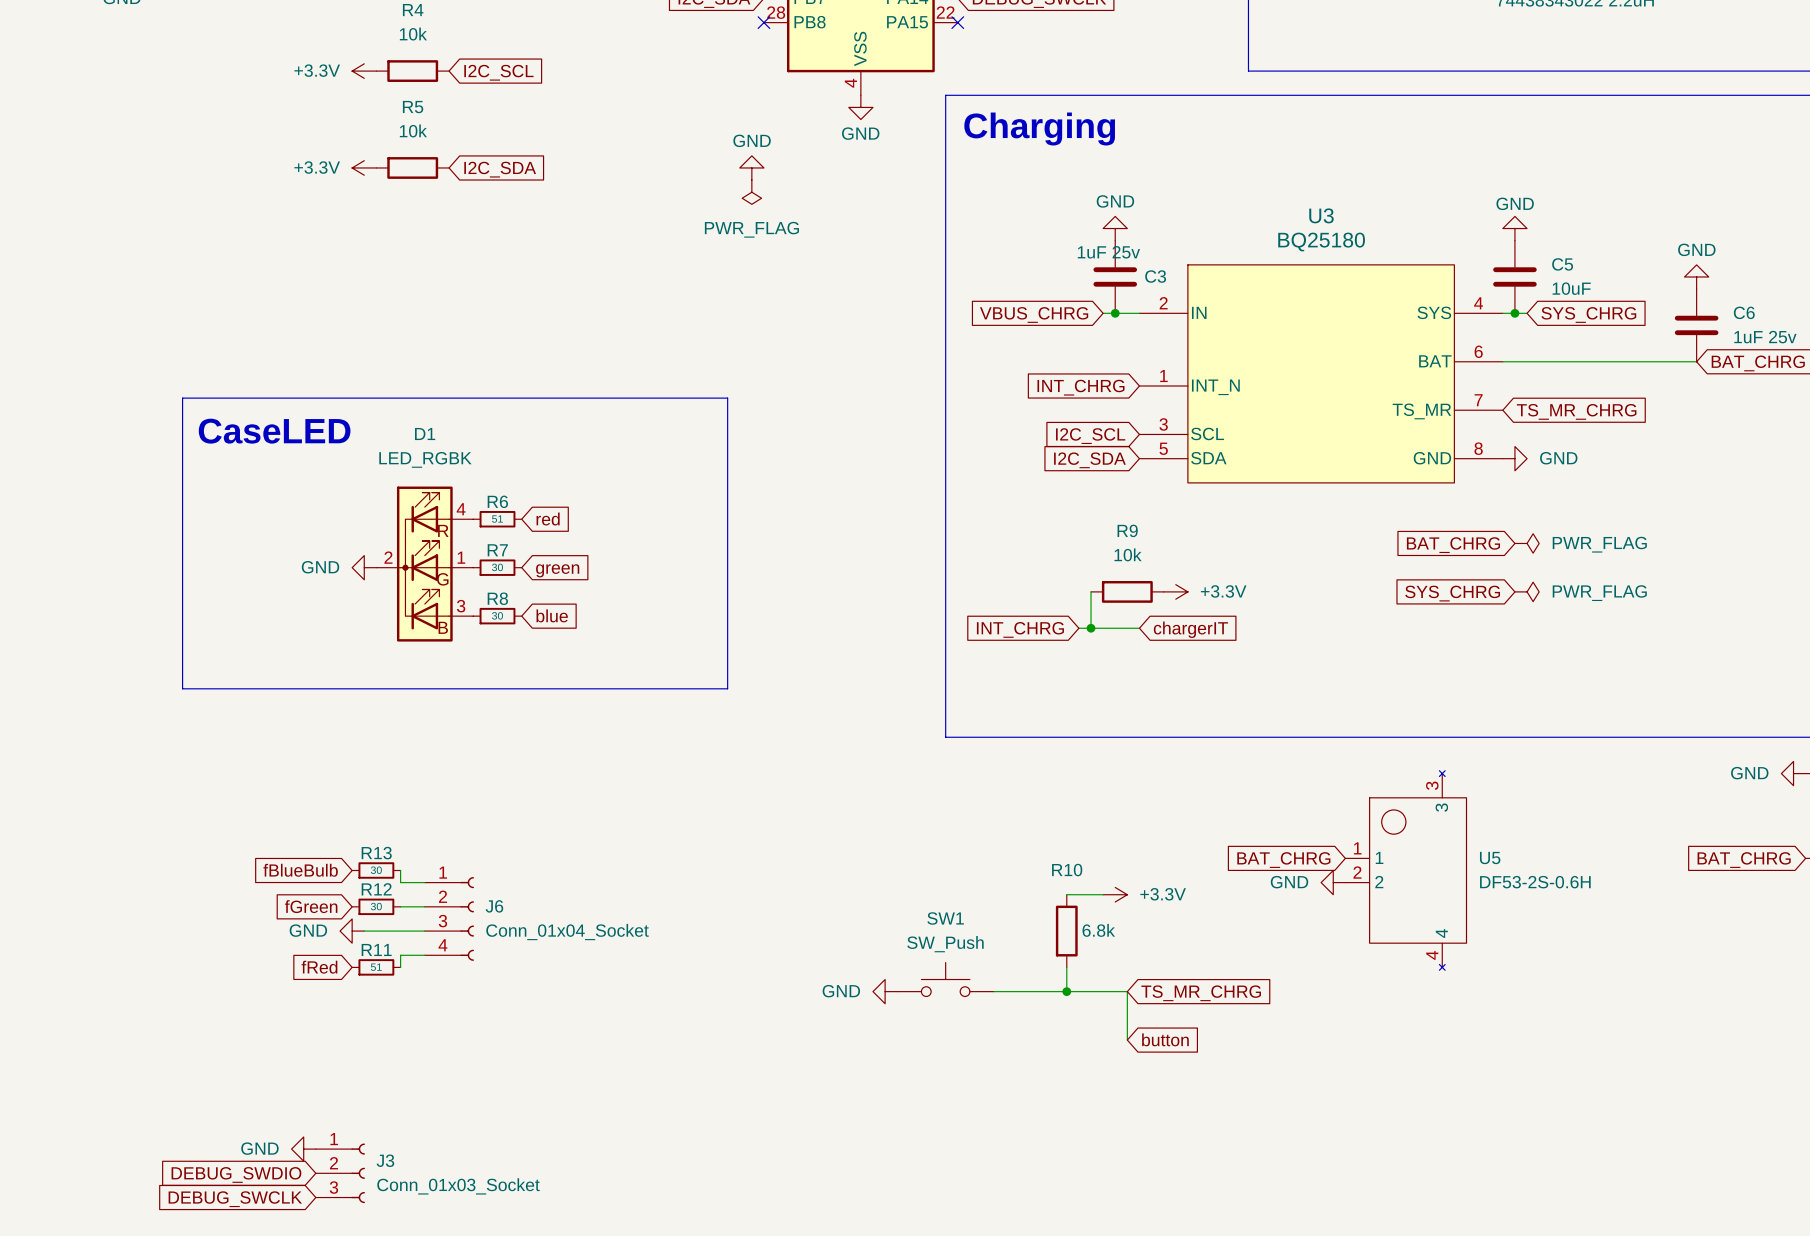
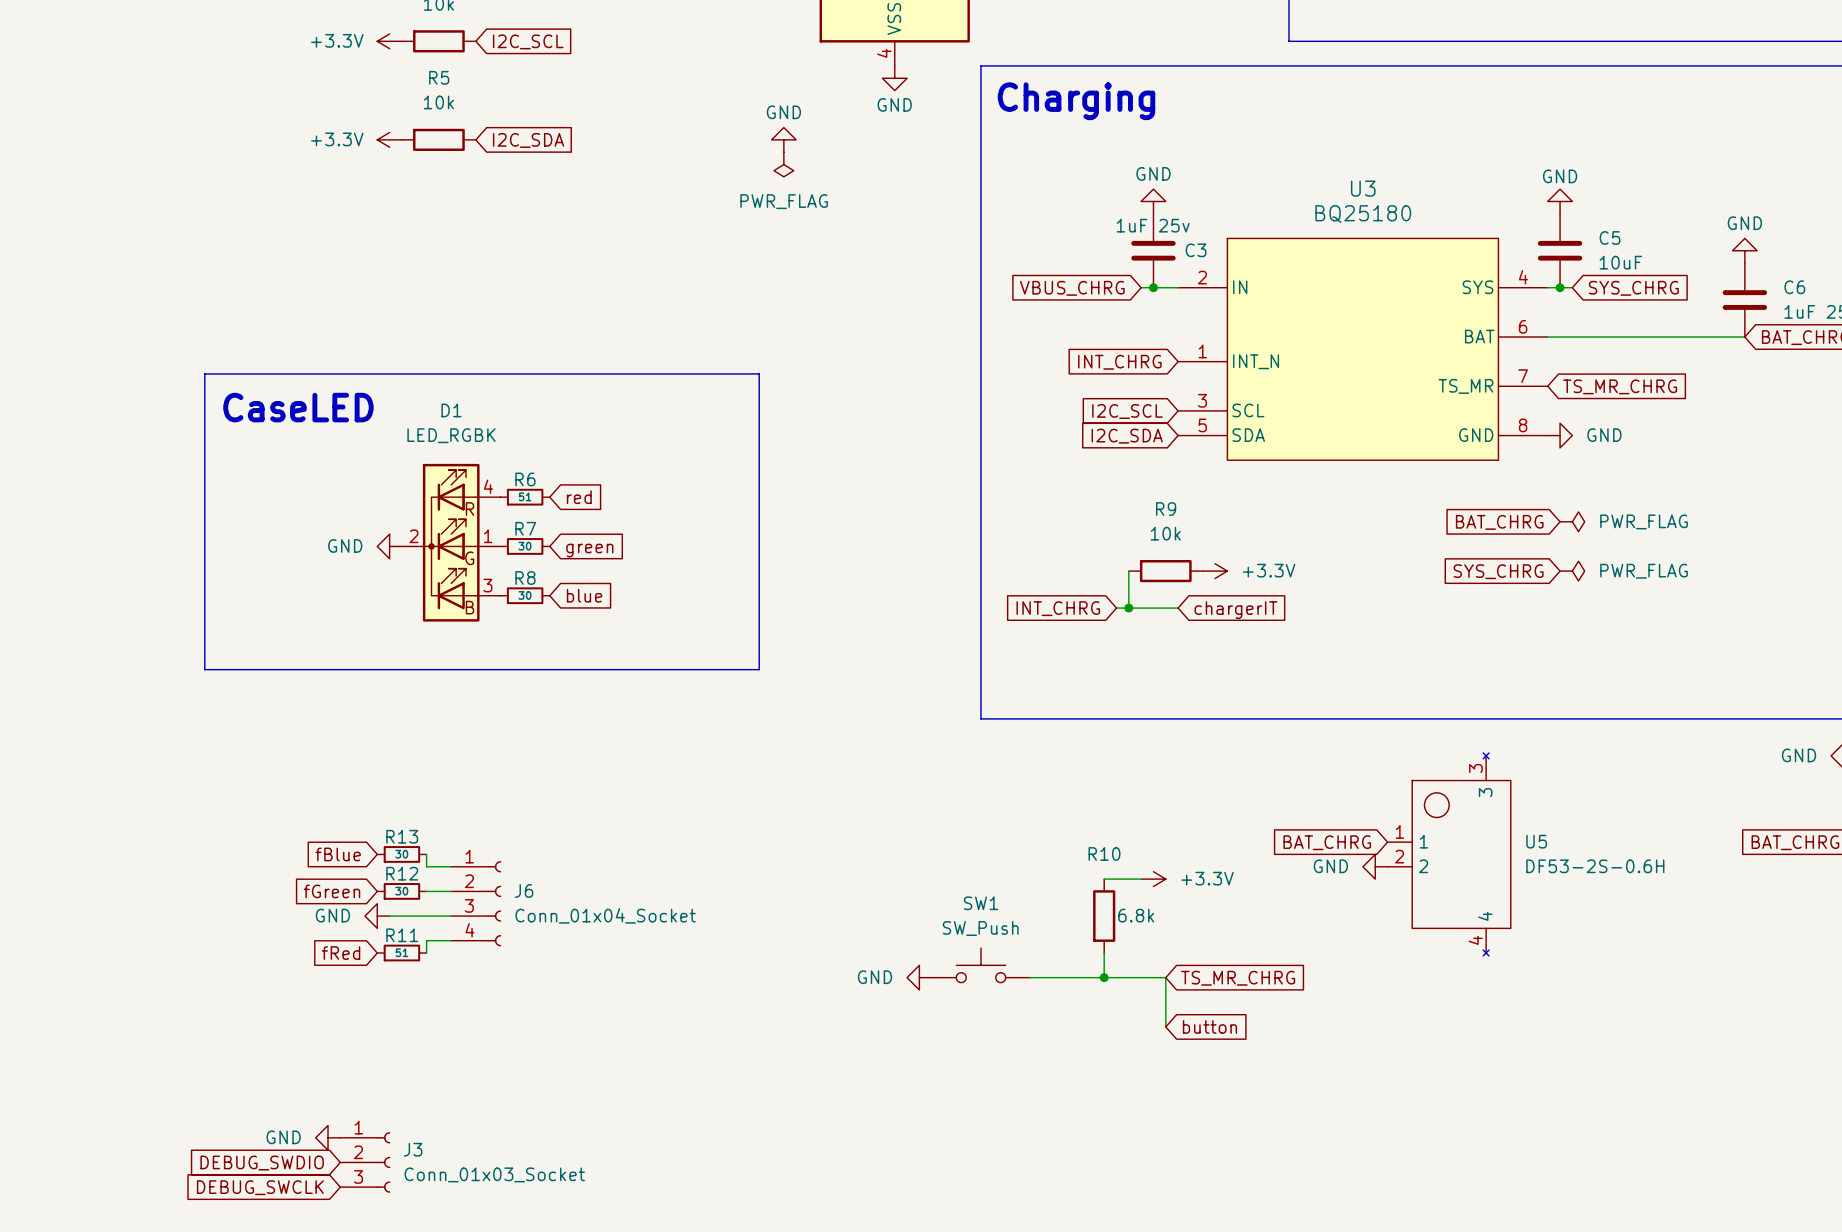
global label: fBlueBulb (300, 870) -> fBlue (338, 854)

